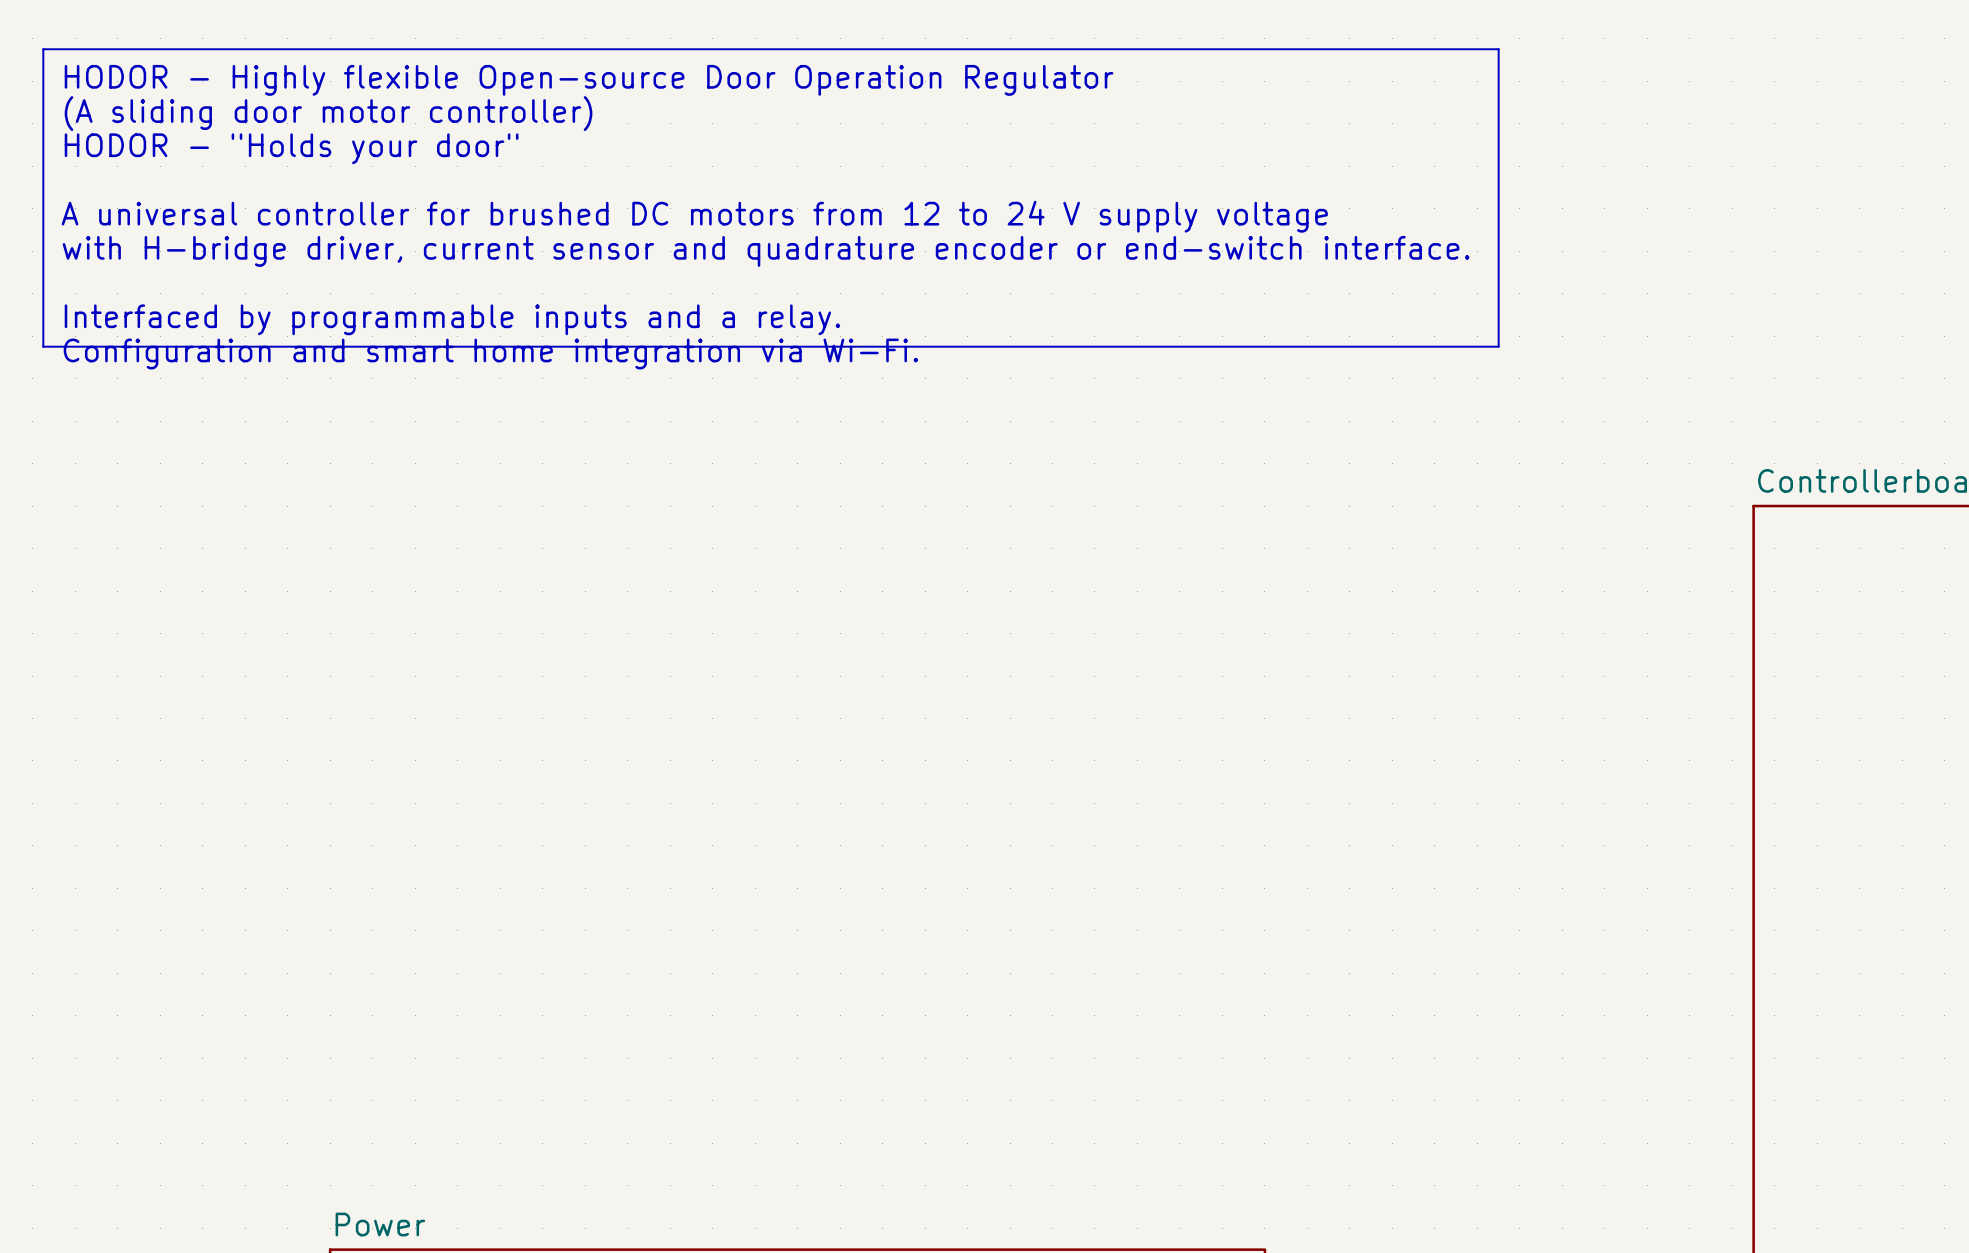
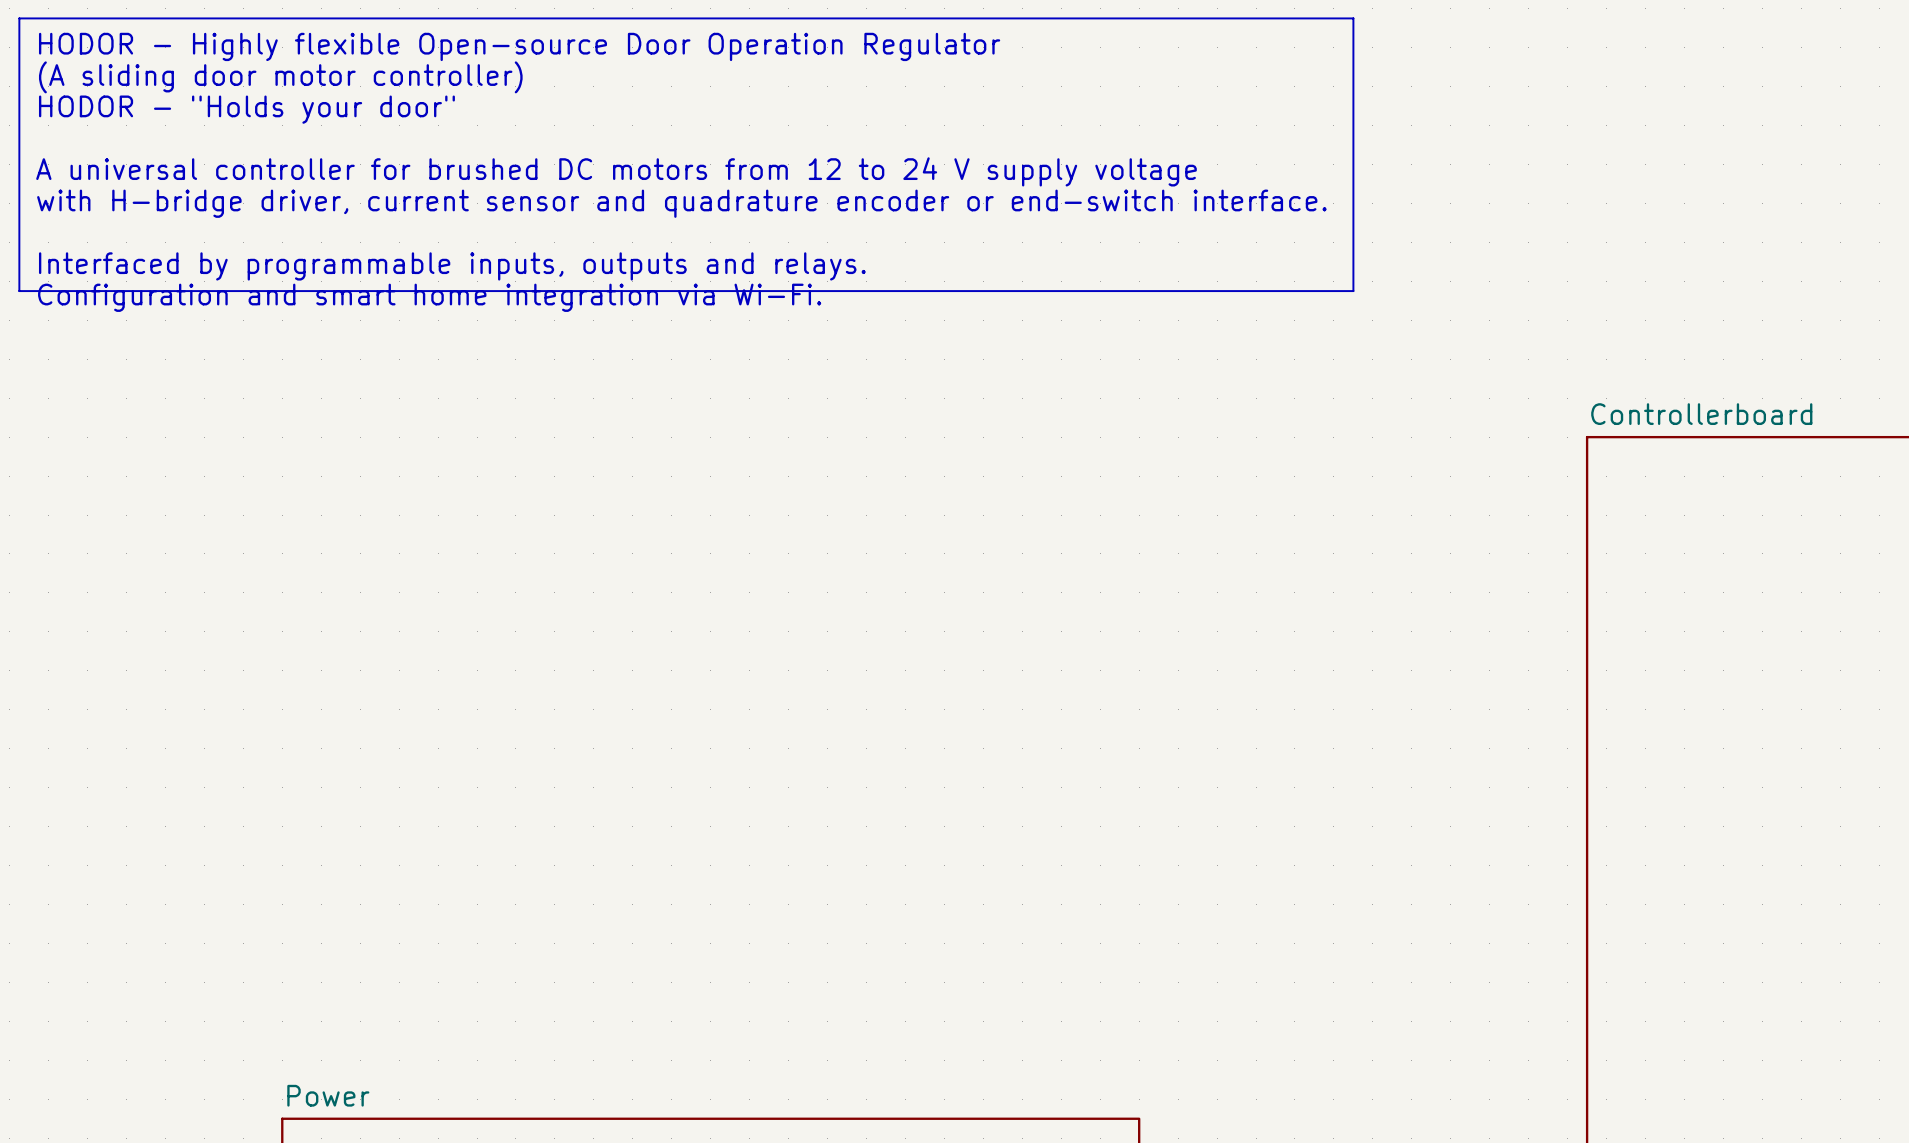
text: Interfaced by programmable inputs and a relay. (452, 319) -> Interfaced by programmable inputs, outputs and relays. (452, 266)

